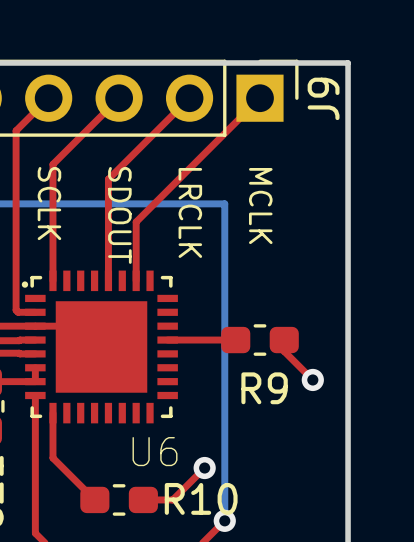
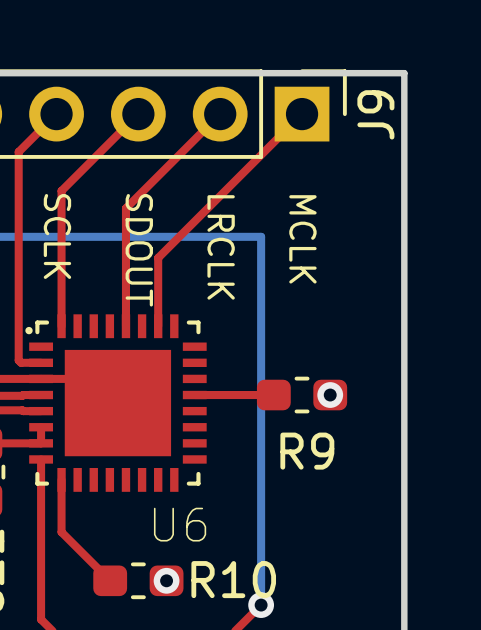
top track: (284, 340) (284, 351) (312, 379) -> none
via: none -> (330, 395)
via: (312, 379) -> none
top track: (204, 468) (172, 499) (143, 499) -> none
via: (204, 468) -> none
via: none -> (166, 580)

